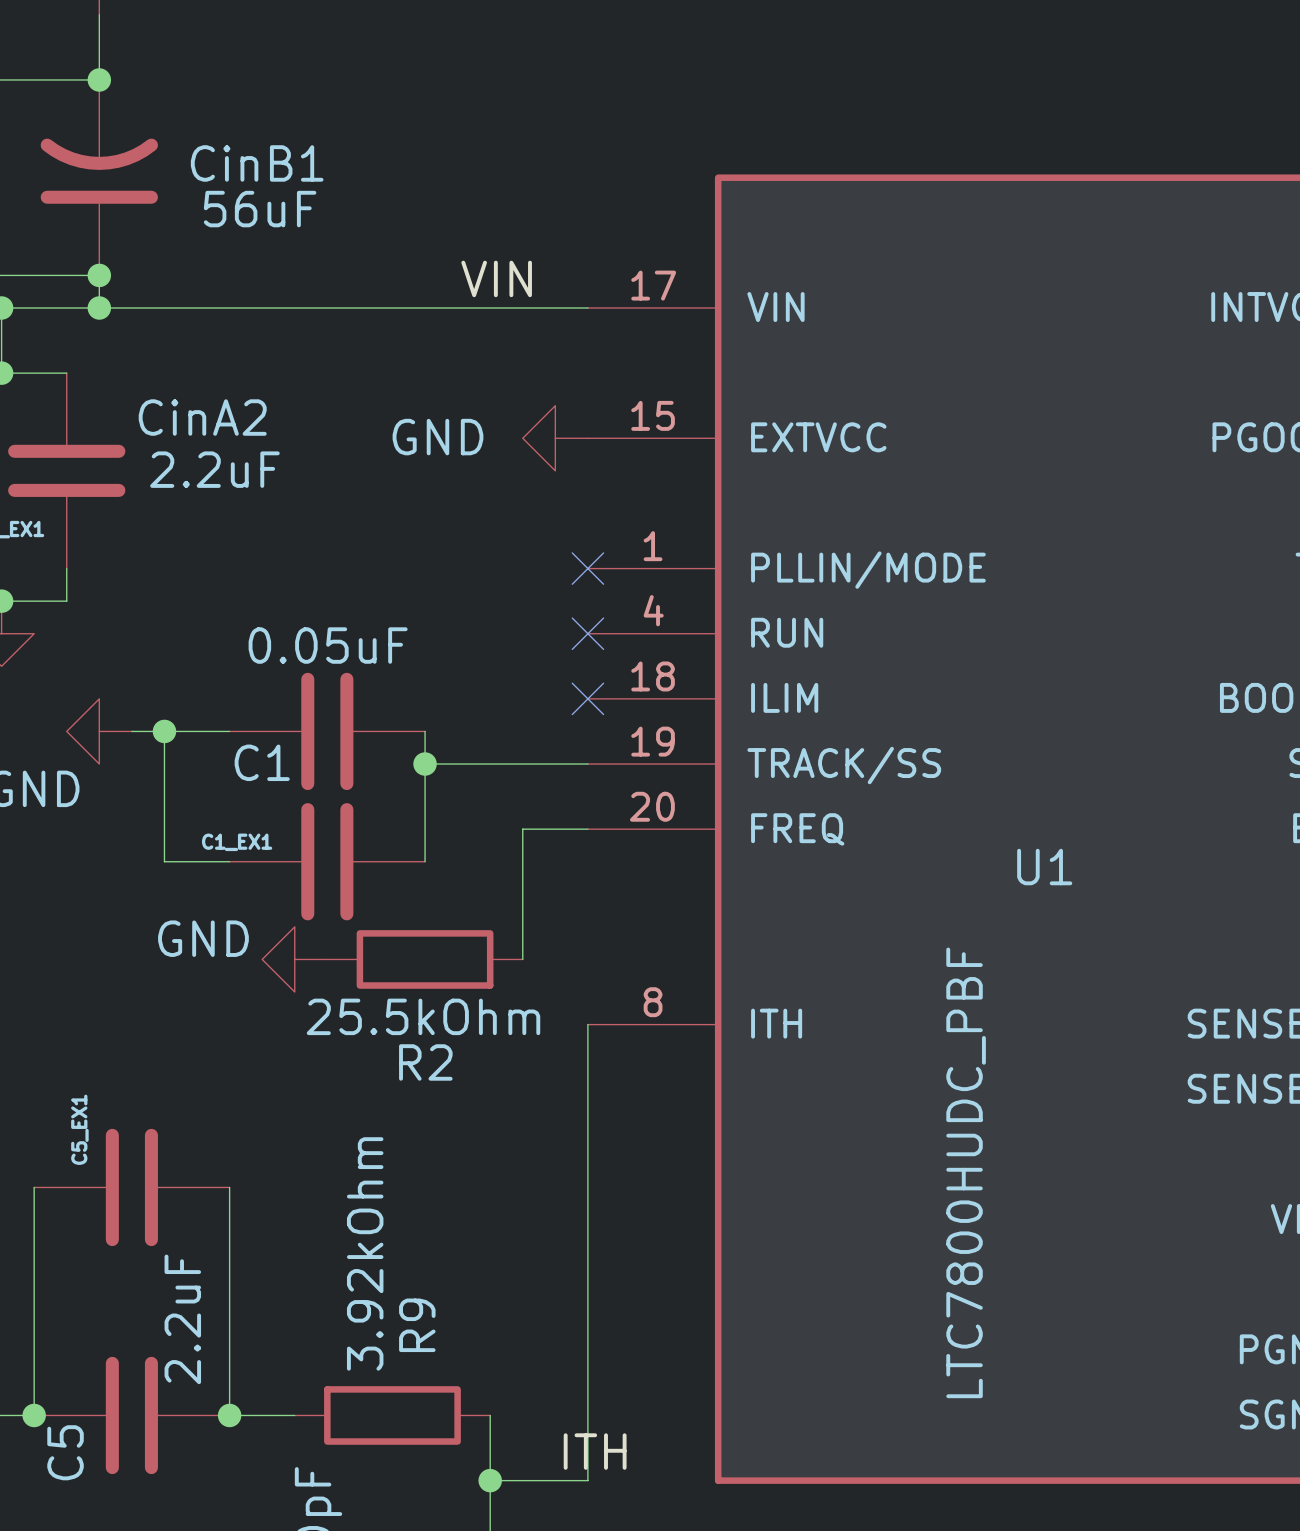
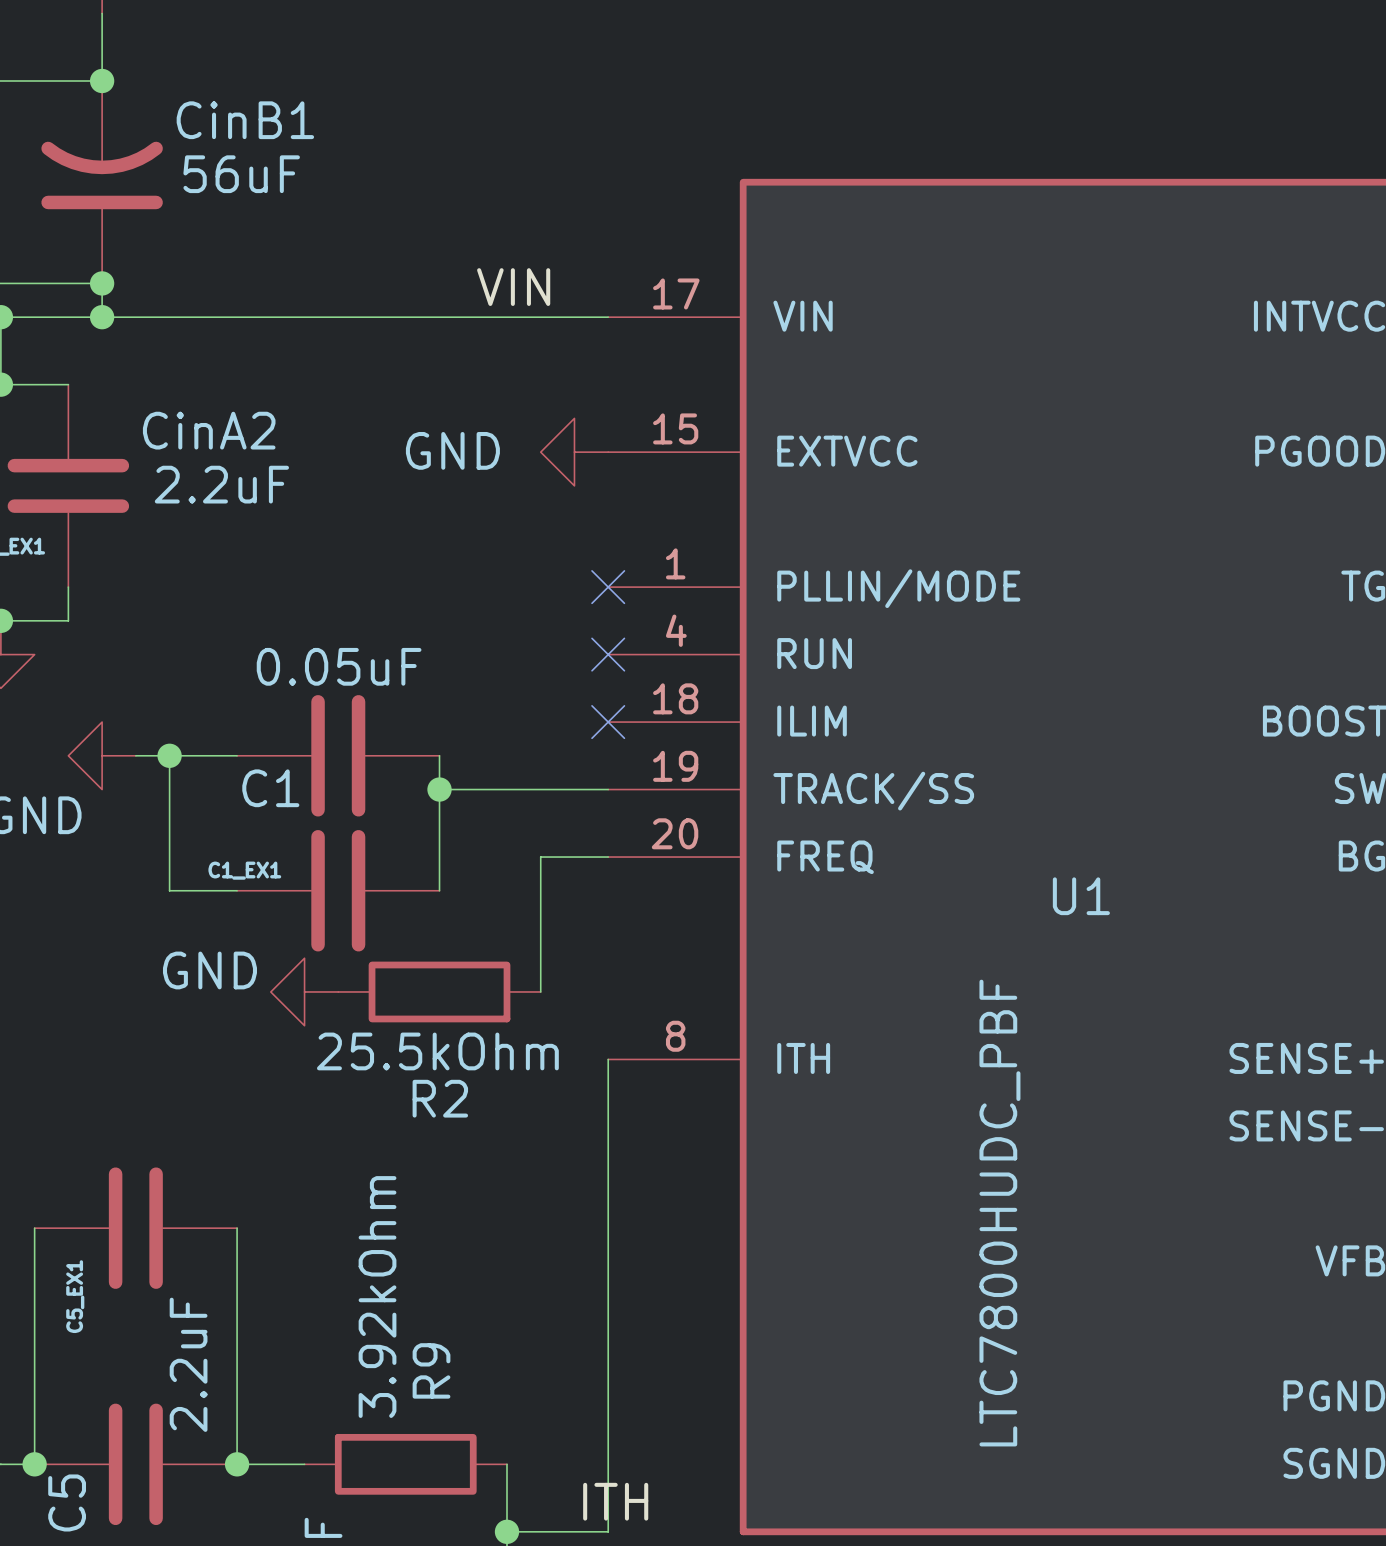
CinB1 name position: CinB1 (257, 163) -> CinB1 (245, 120)
CinB1 value position: 56uF (260, 209) -> 56uF (241, 174)
C5_EX1 name position: C5_EX1 (79, 1129) -> C5_EX1 (75, 1296)

